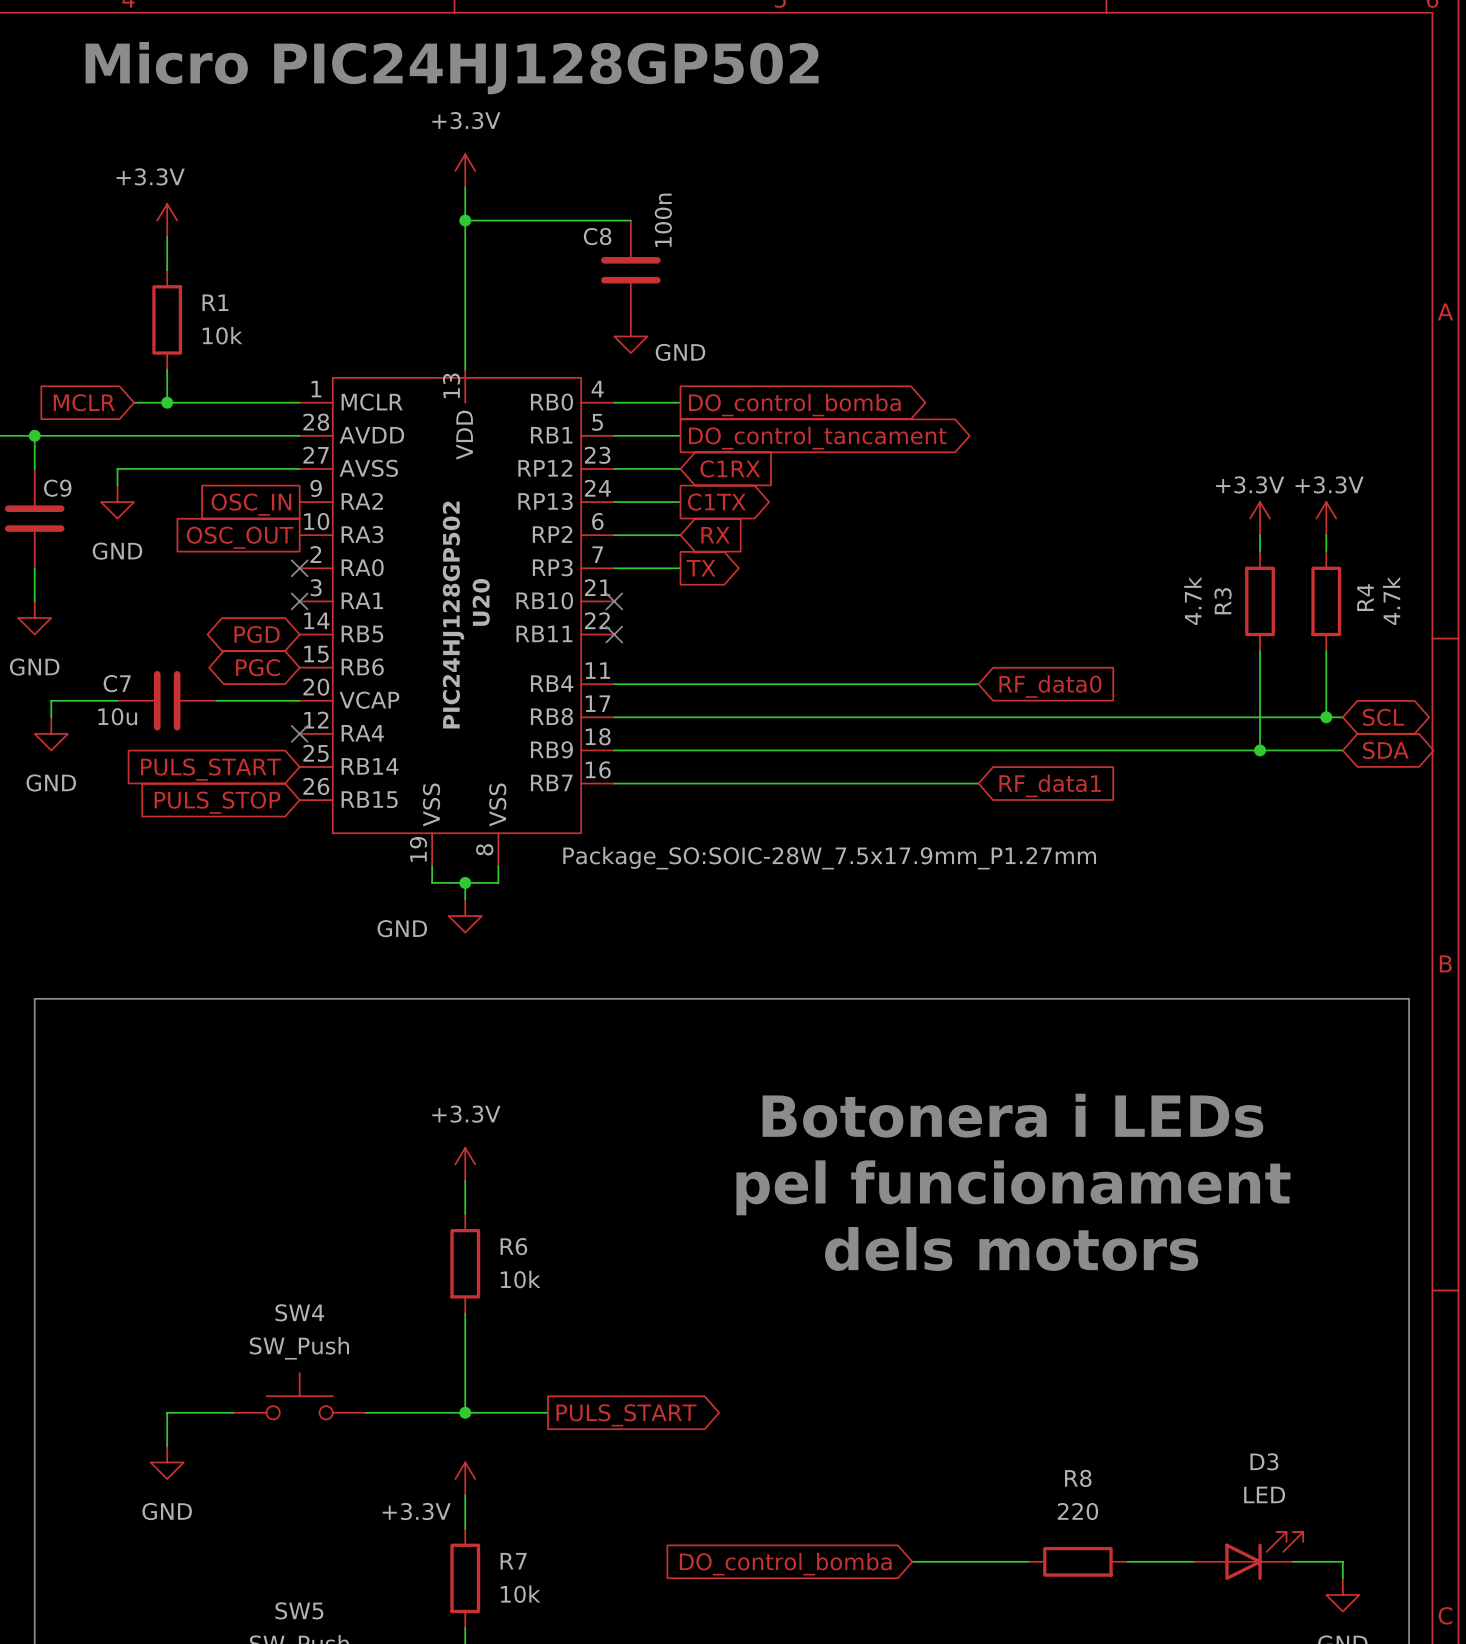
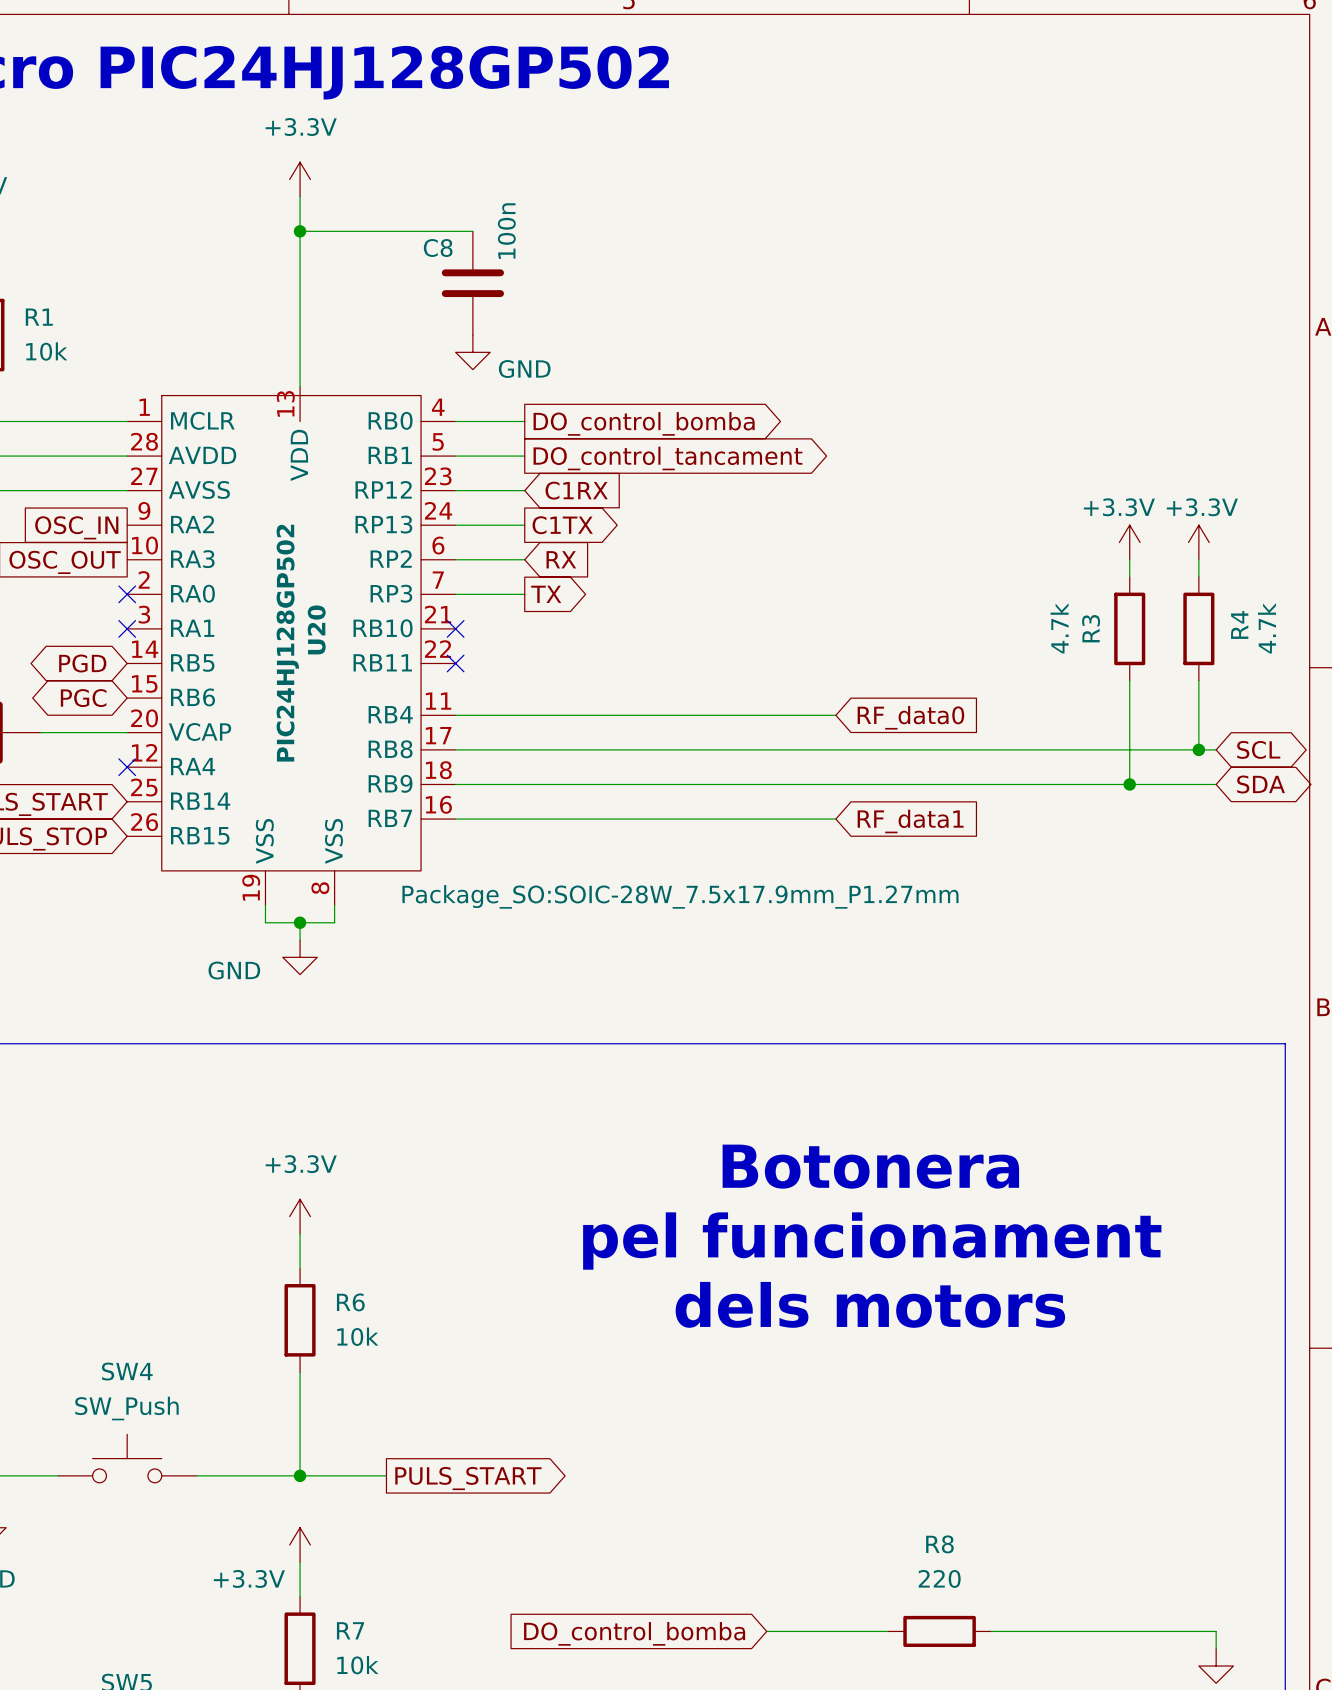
text: Botonera i LEDs (1012, 1115) -> Botonera (870, 1166)
D3: LED (1248, 1556) -> none

